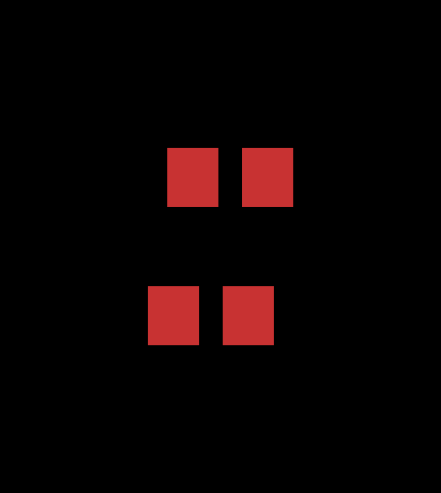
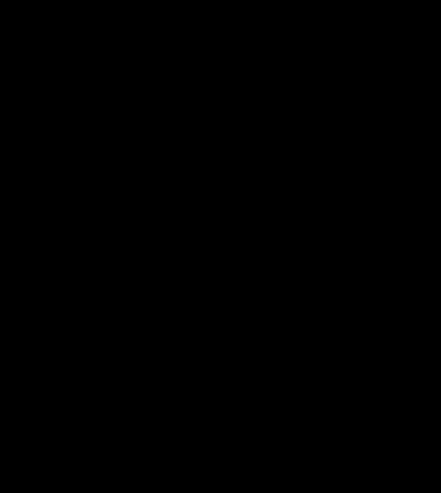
part: (230, 177) -> none
part: (210, 315) -> none

